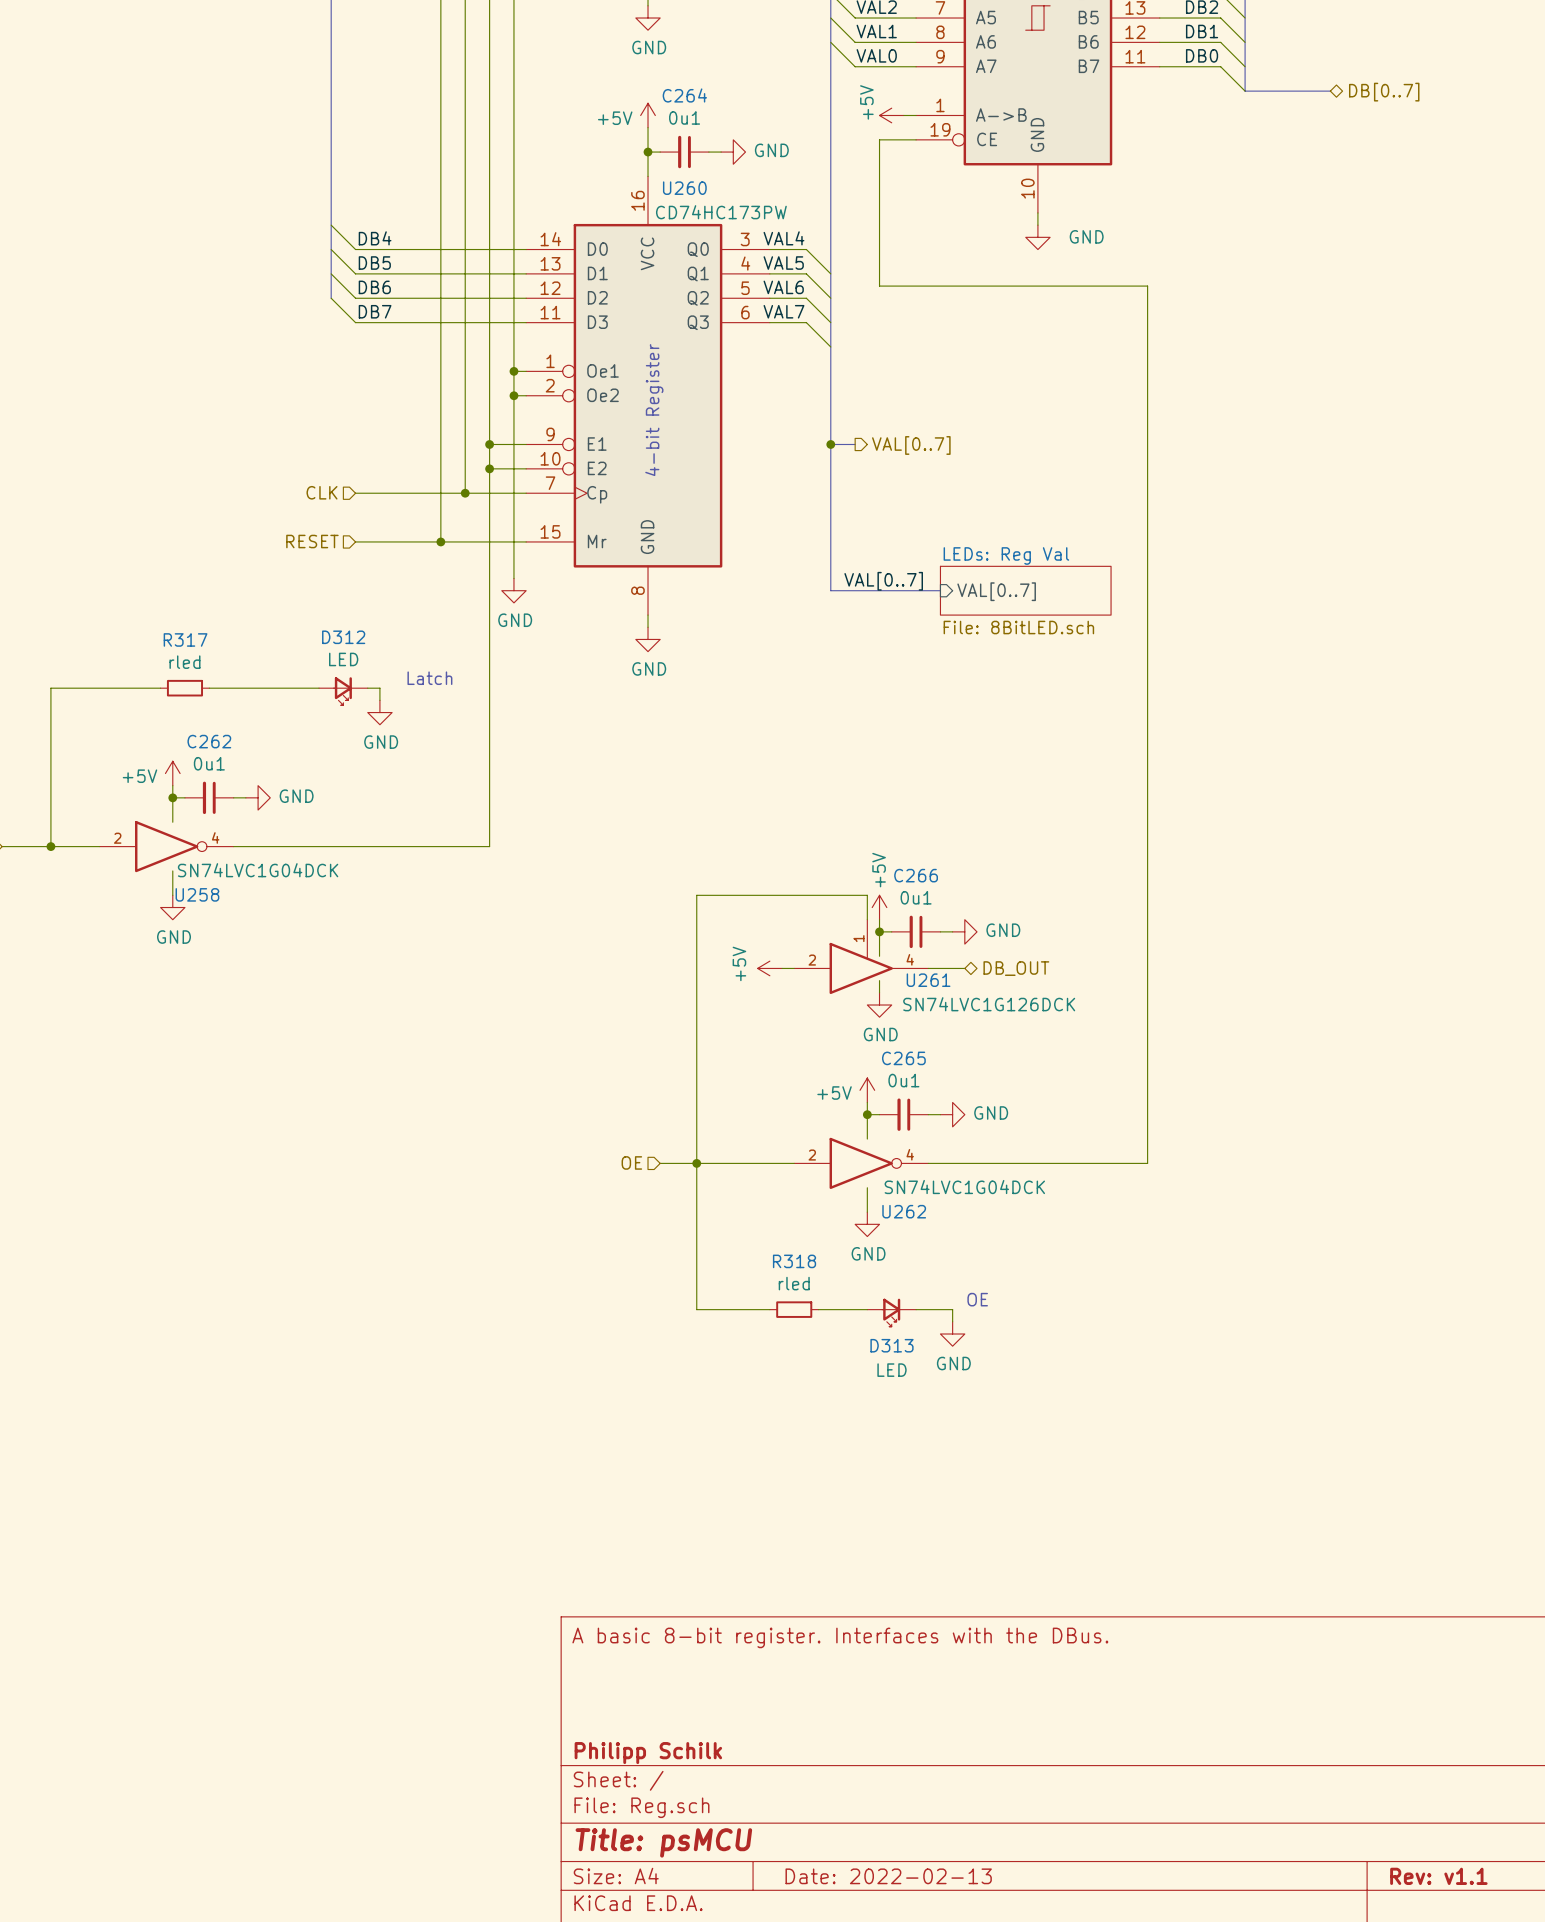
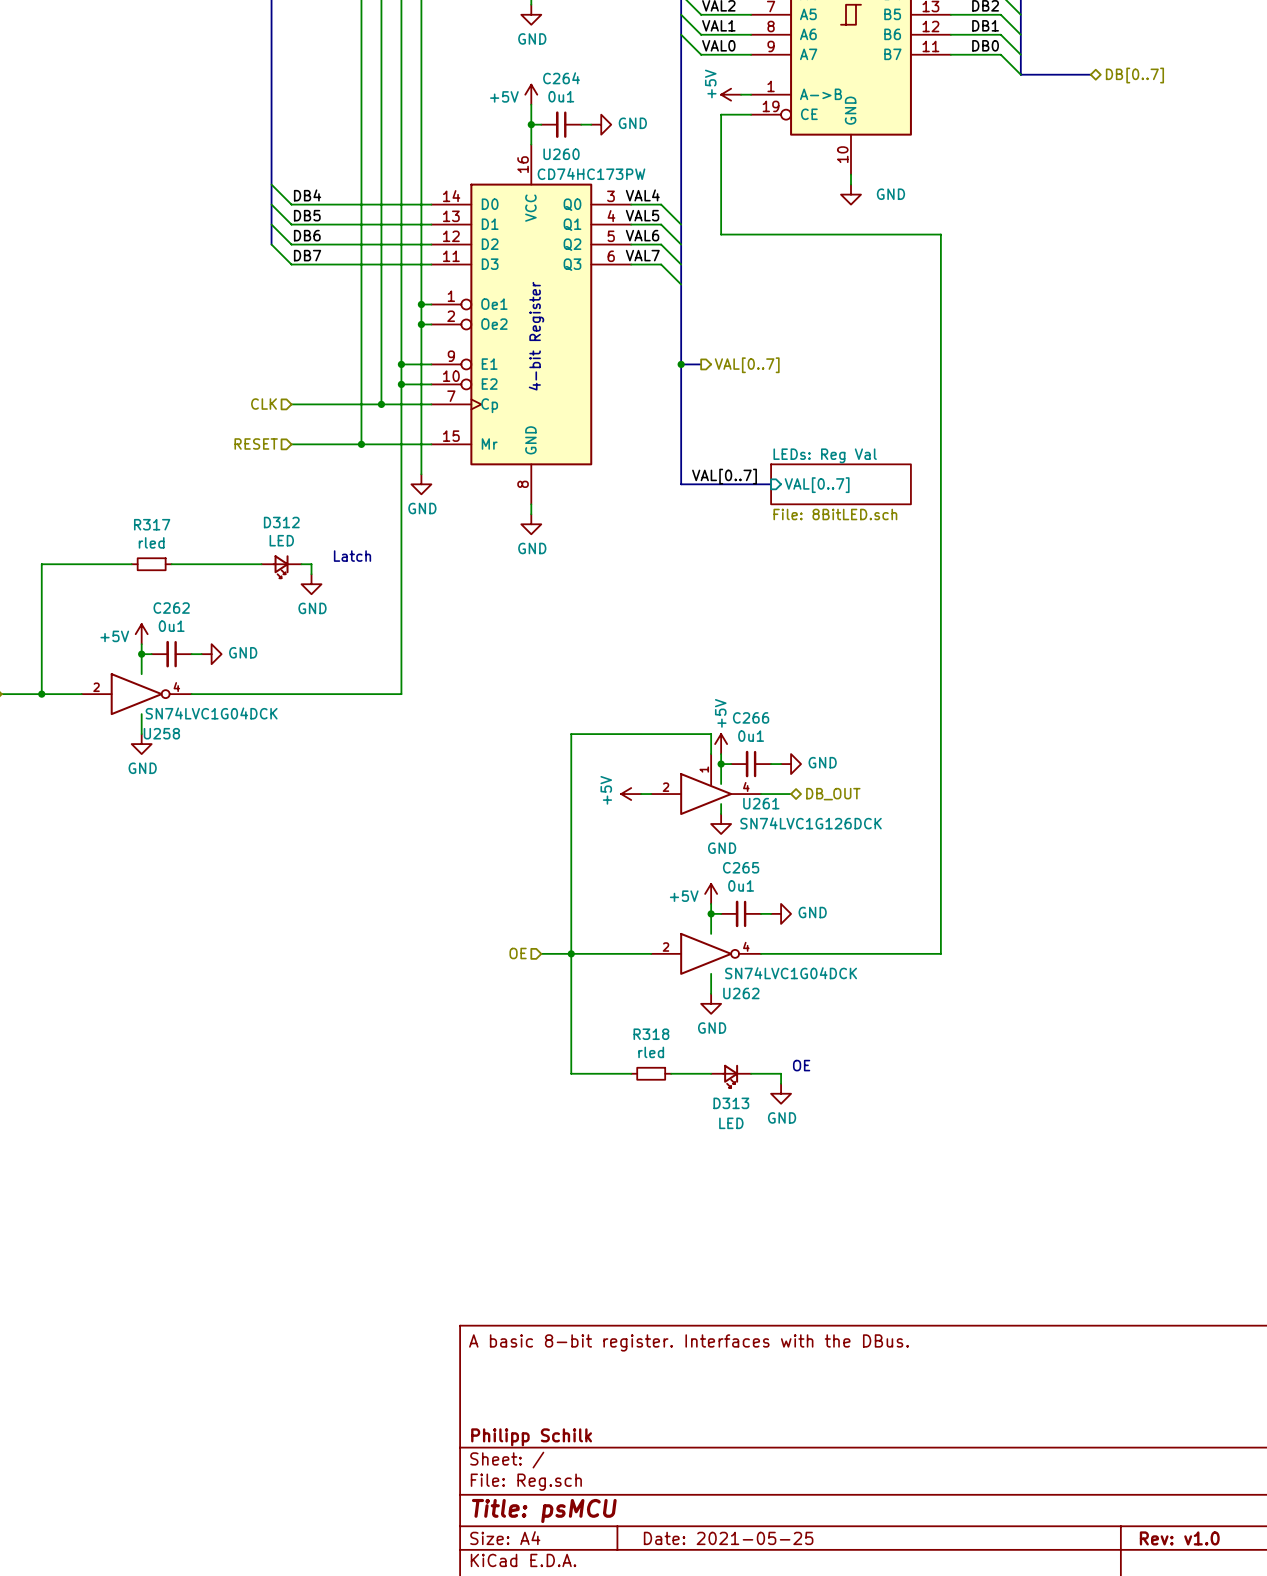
title block: Date: 2022-02-13 (888, 1876) -> Date: 2021-05-25 (728, 1538)
title block: Rev: v1.1 (1438, 1876) -> Rev: v1.0 (1179, 1538)

